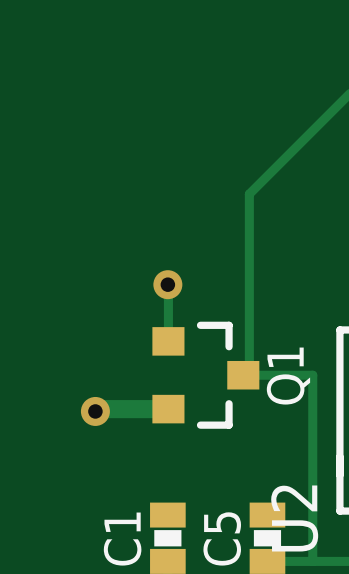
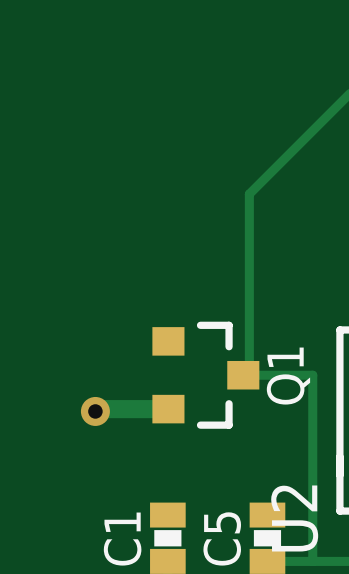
via: (167, 284) -> none
track: (168, 284) (168, 341) -> none

